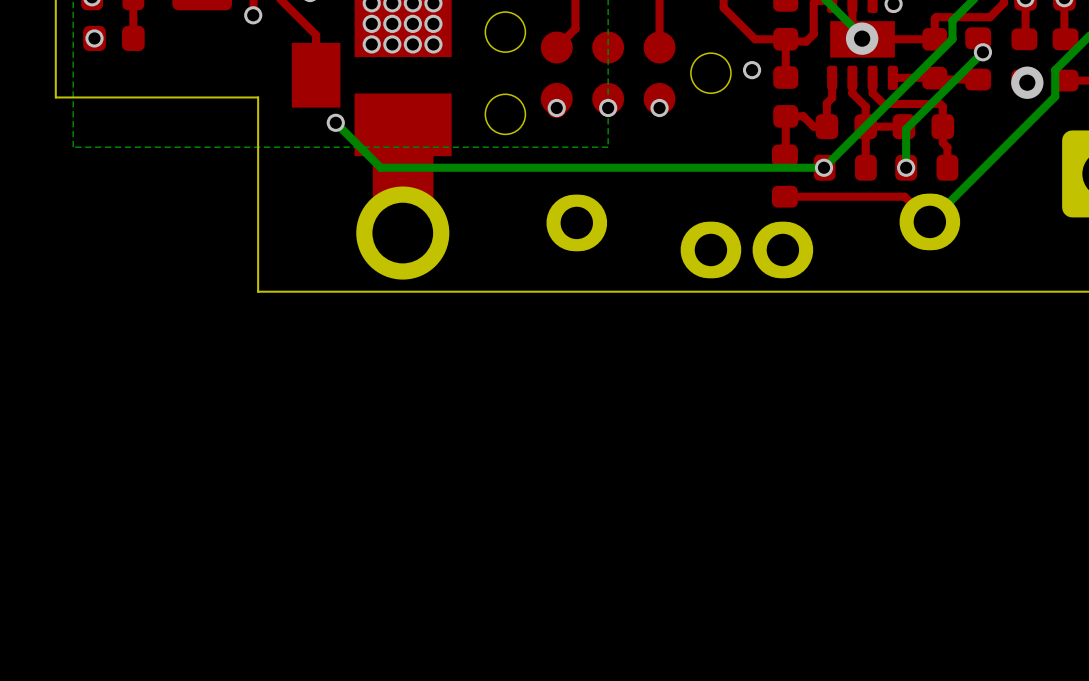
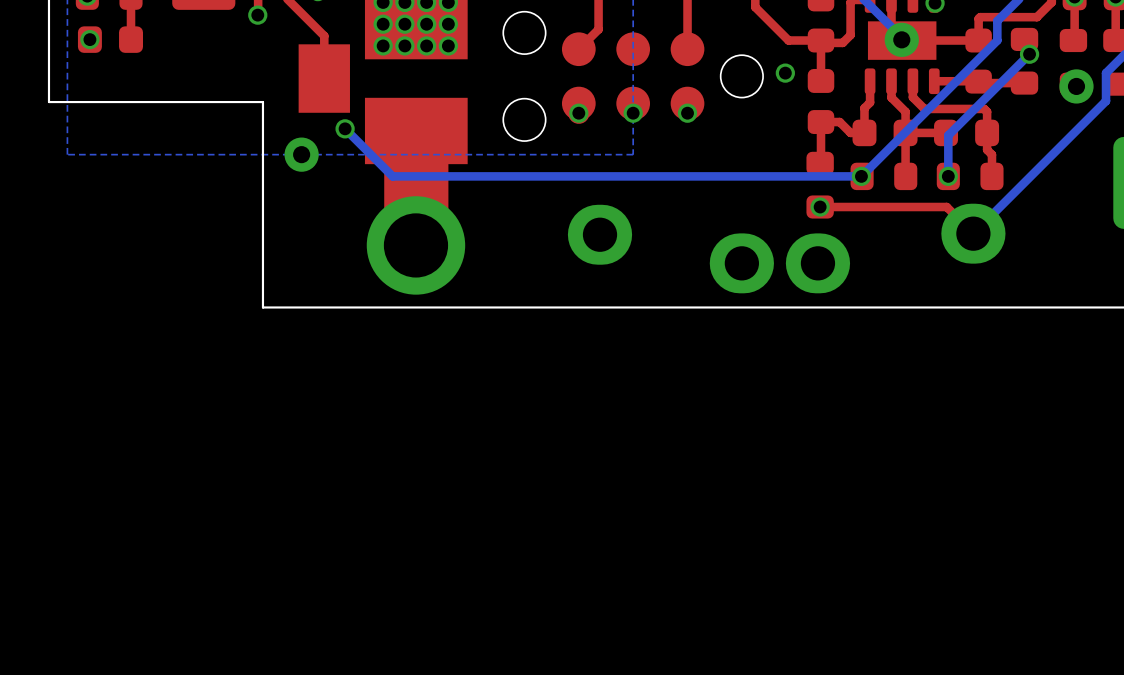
via: none -> (301, 154)
via: none -> (820, 207)

